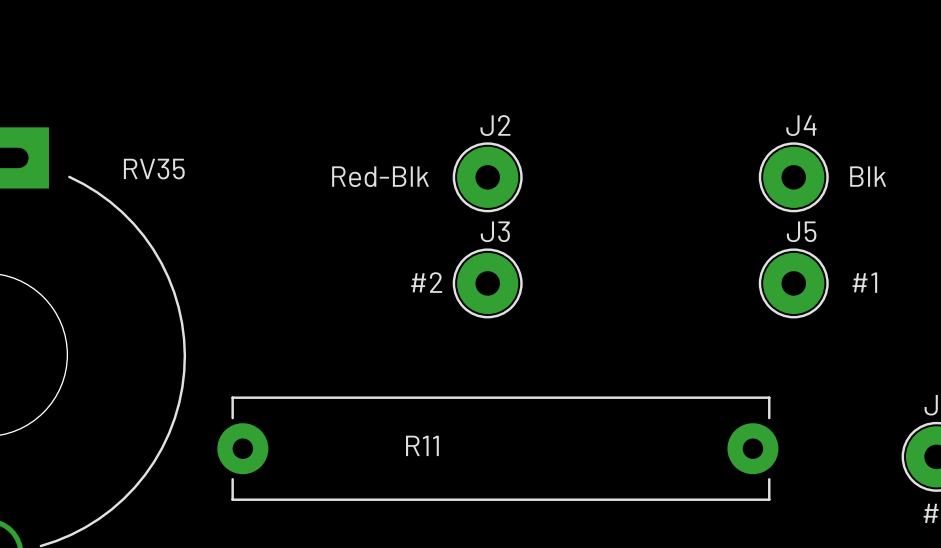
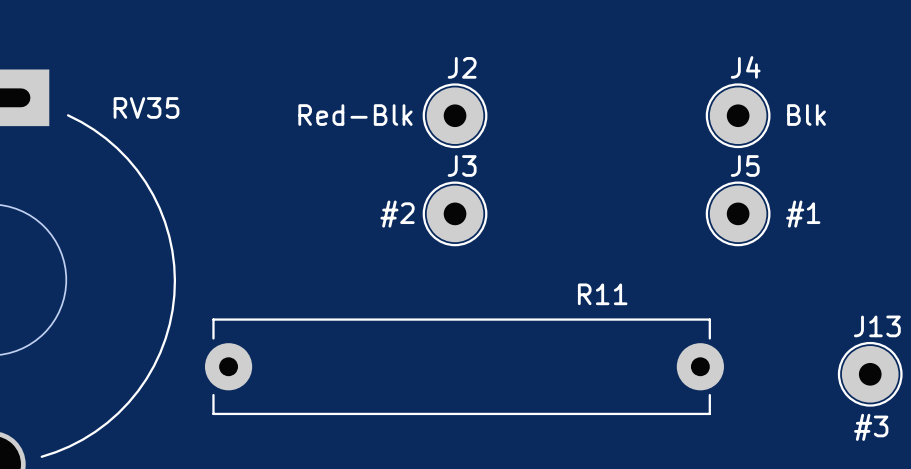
R11 name position: R11 (422, 445) -> R11 (602, 294)
R11 rotation: 0° (497, 448) -> 180° (464, 366)

